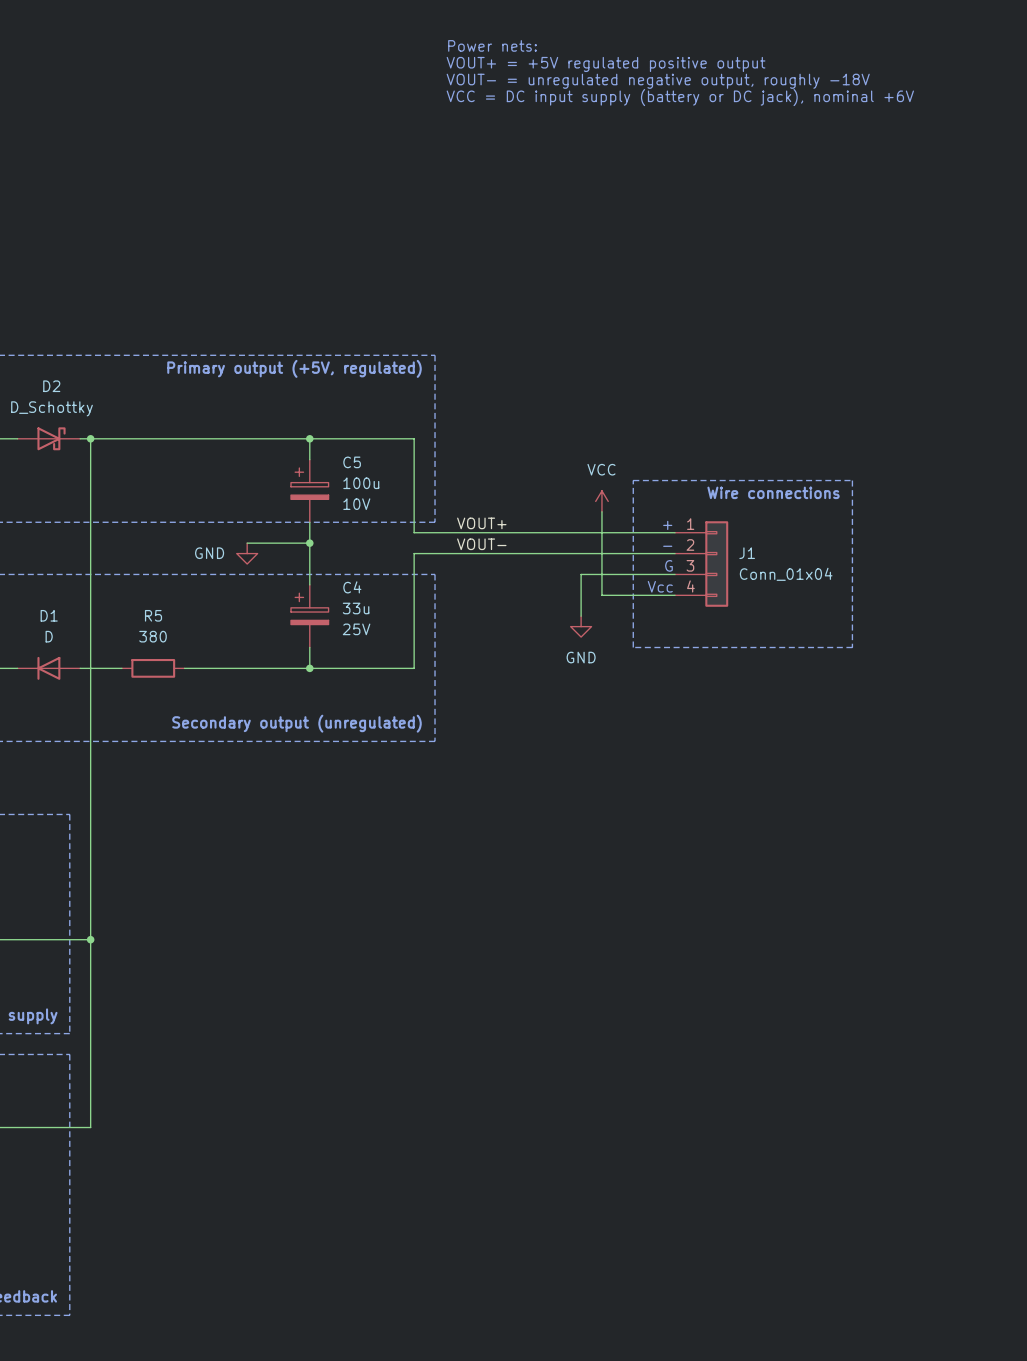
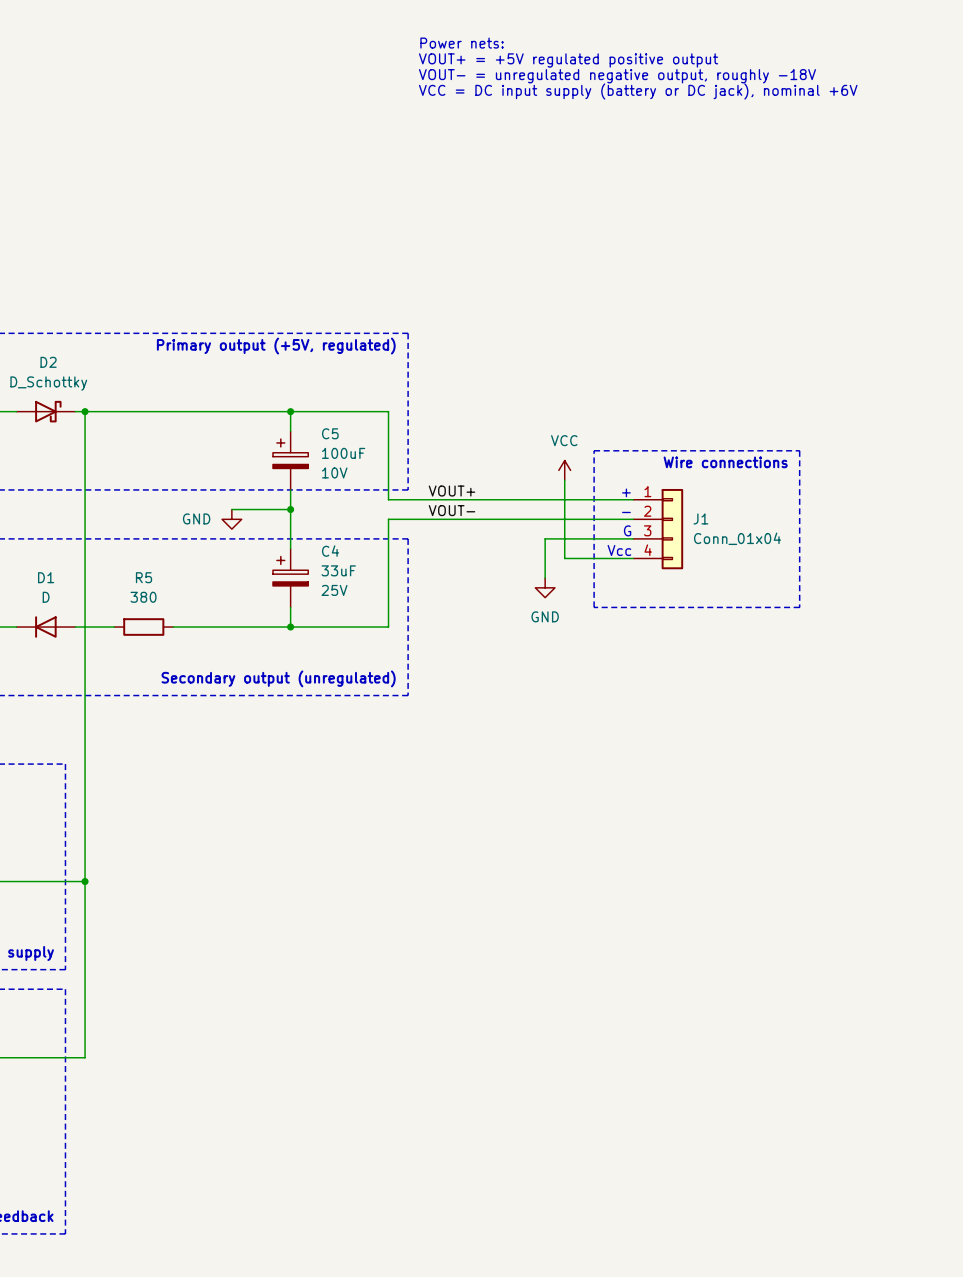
C5 value: 100u (361, 483) -> 100uF (343, 453)
C4 value: 33u (356, 608) -> 33uF (338, 570)

